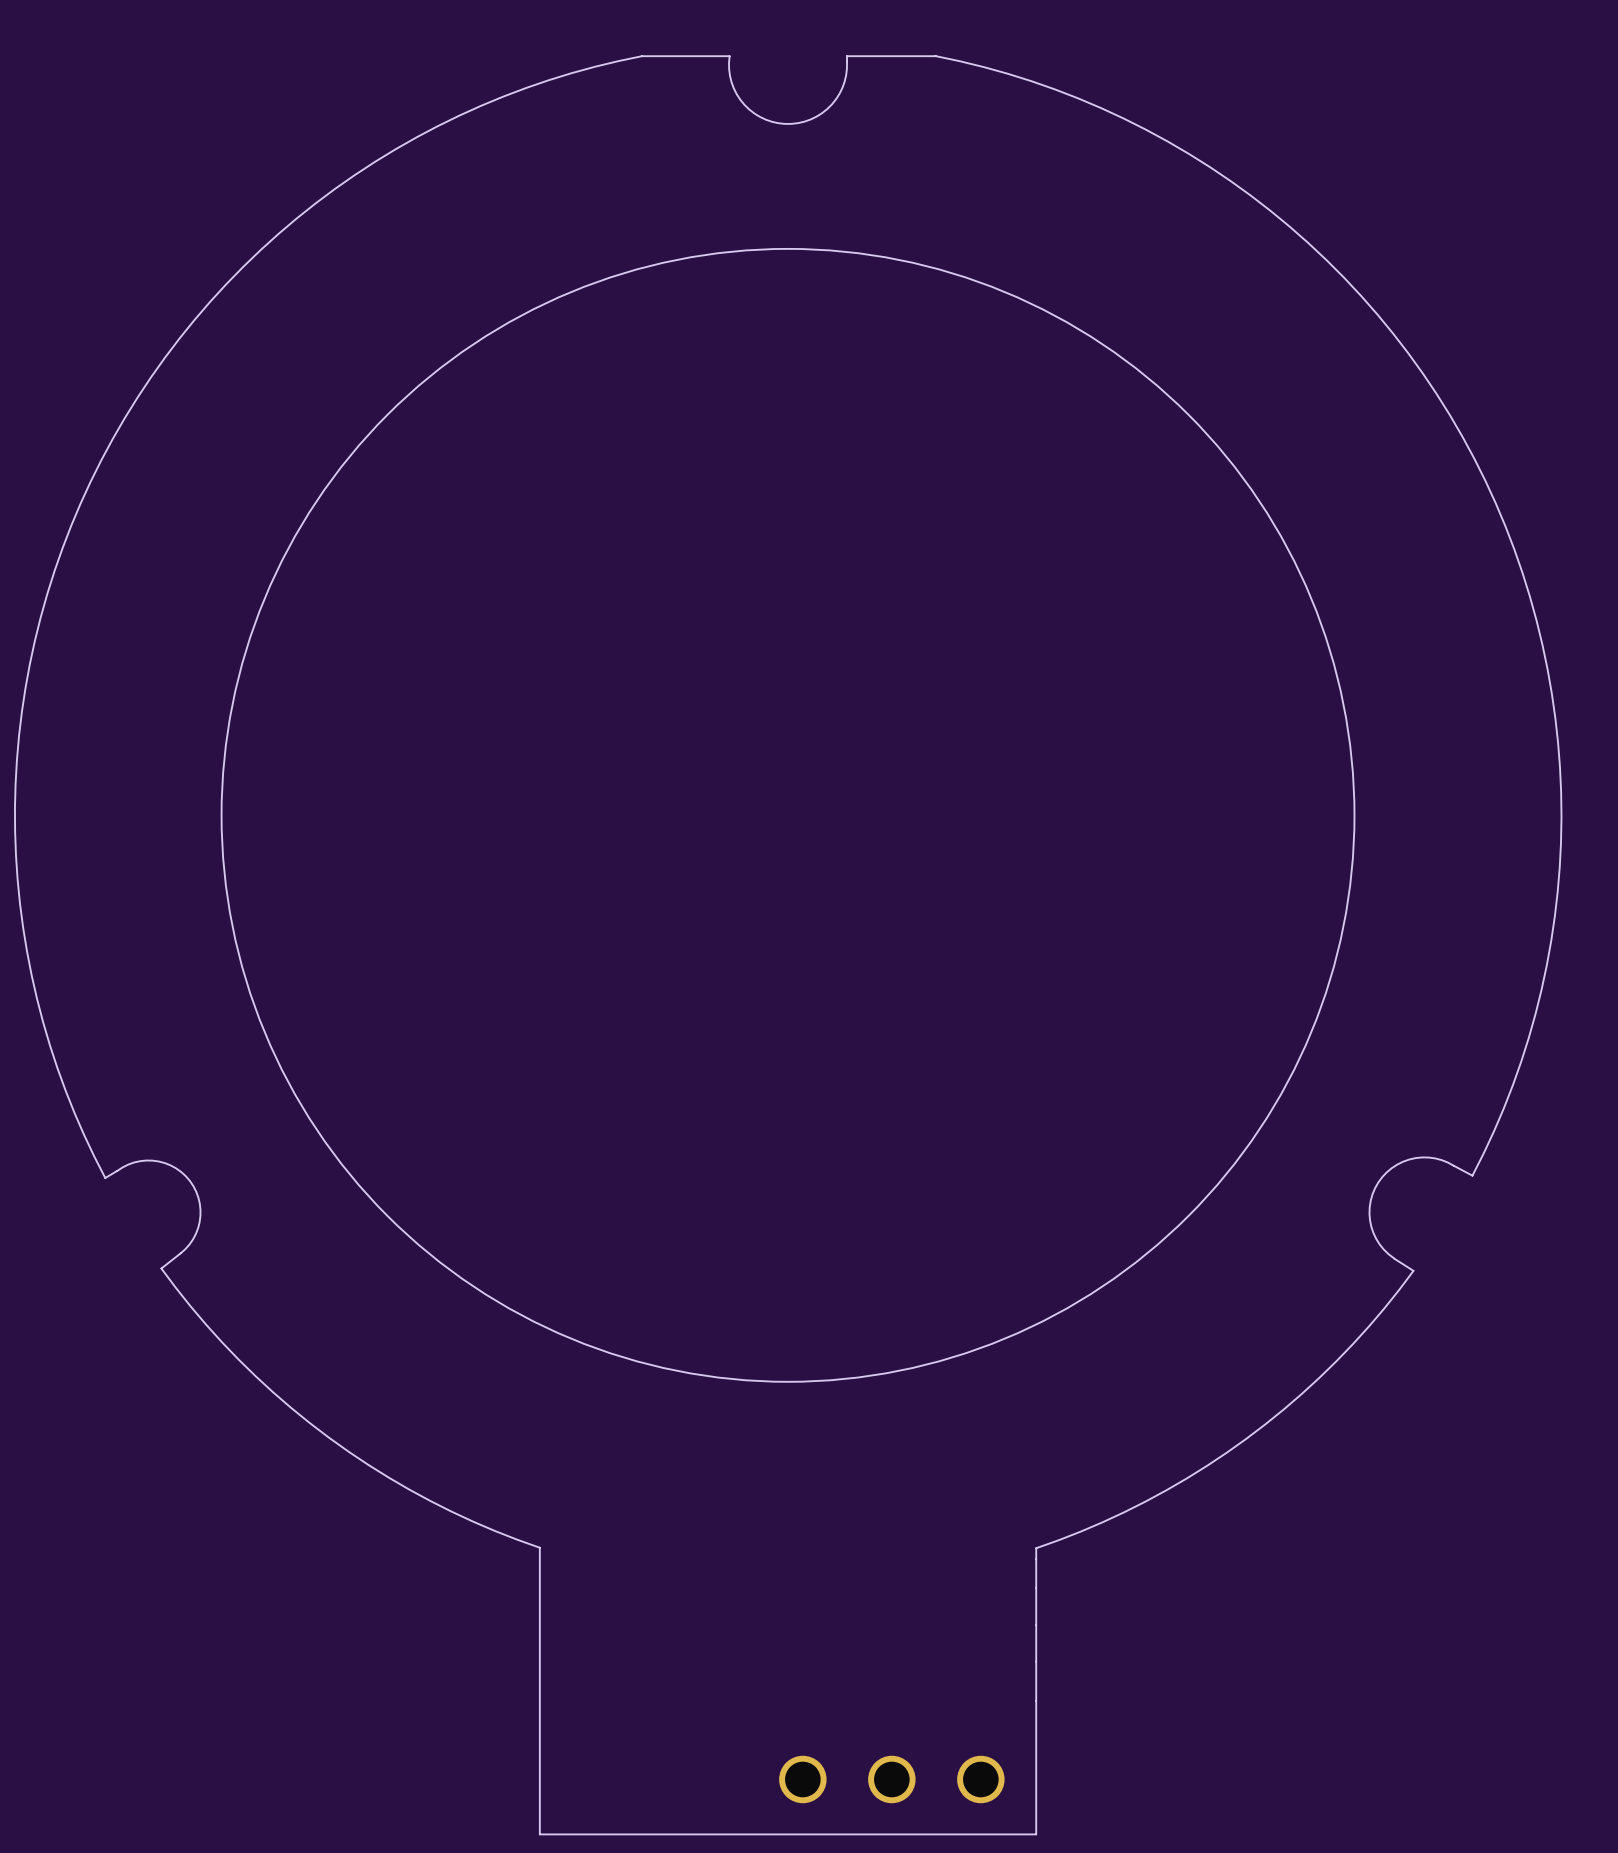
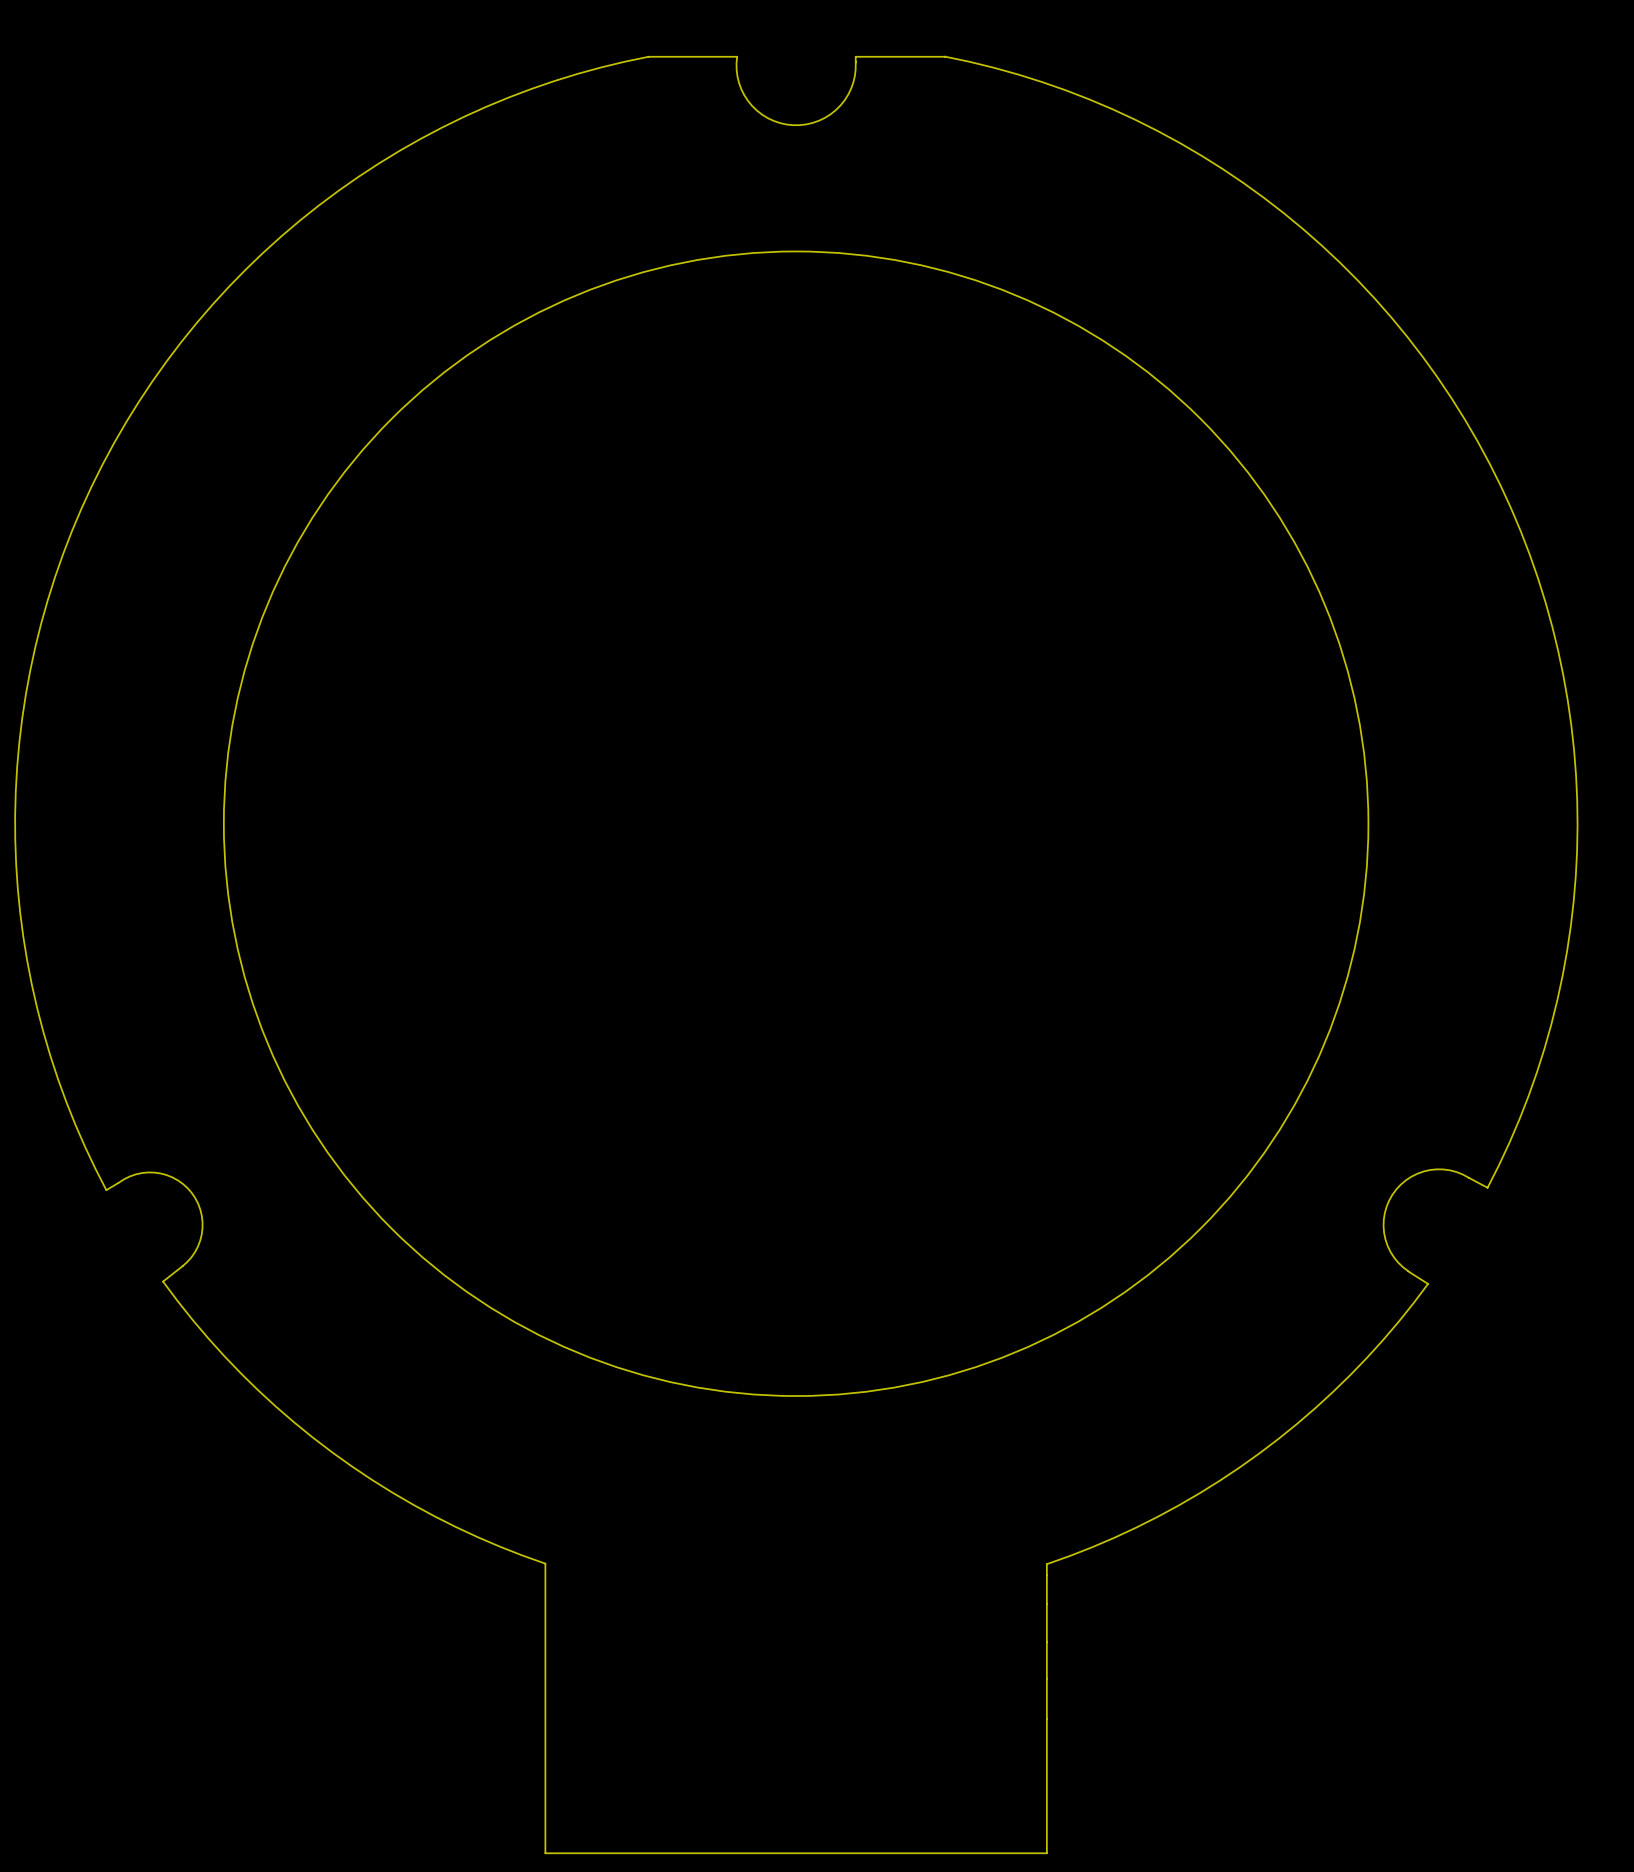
part: (802, 1779) -> none
part: (891, 1779) -> none
part: (980, 1779) -> none

